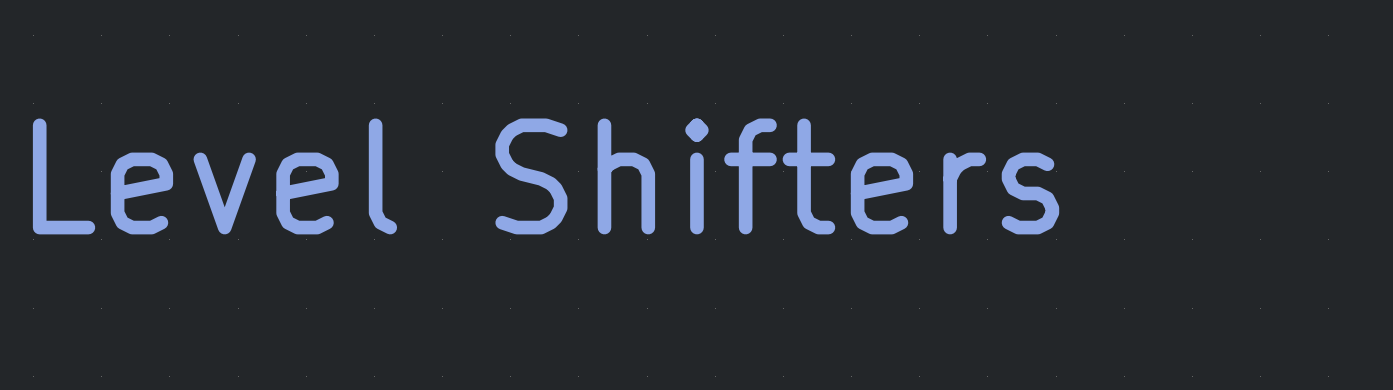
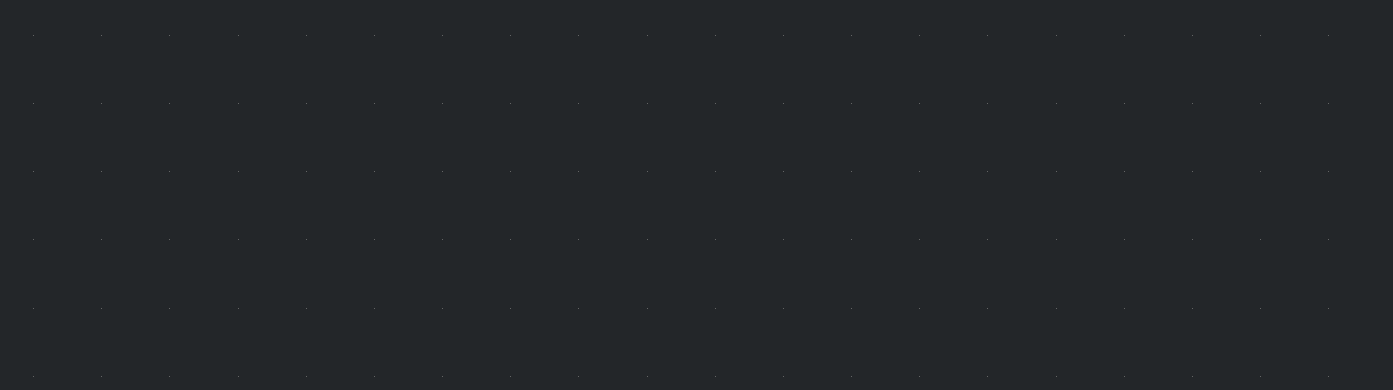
text: Level Shifters (546, 176) -> none

